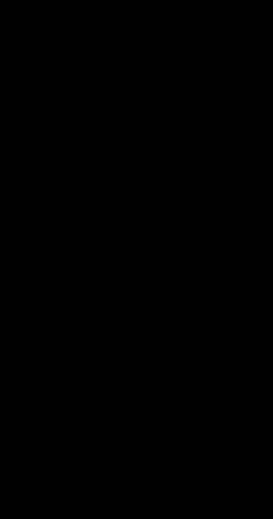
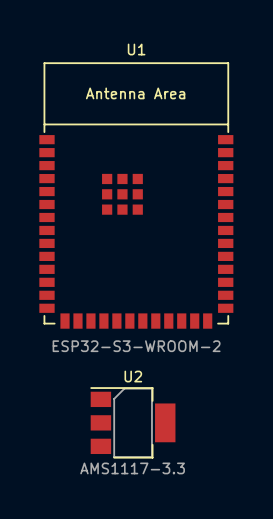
U1: none -> ESP32-S3-WROOM-2 (136, 195)
U2: none -> AMS1117-3.3 (133, 422)

